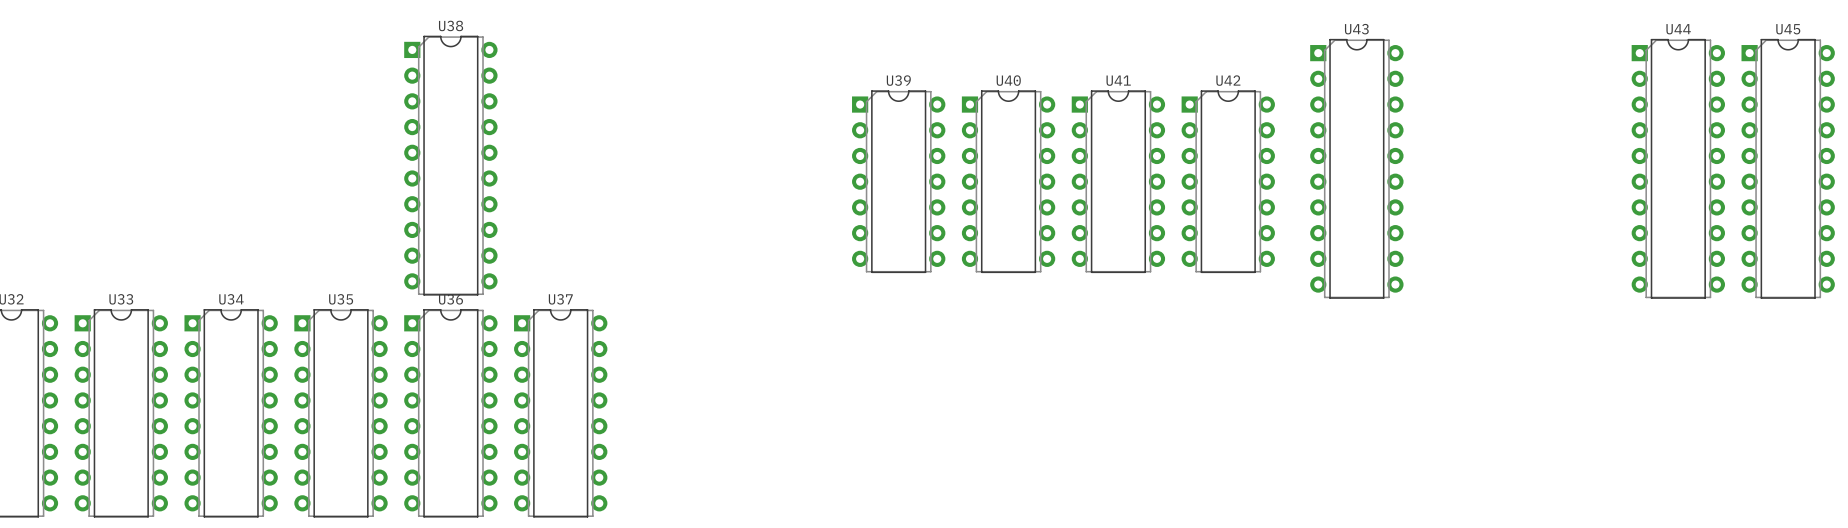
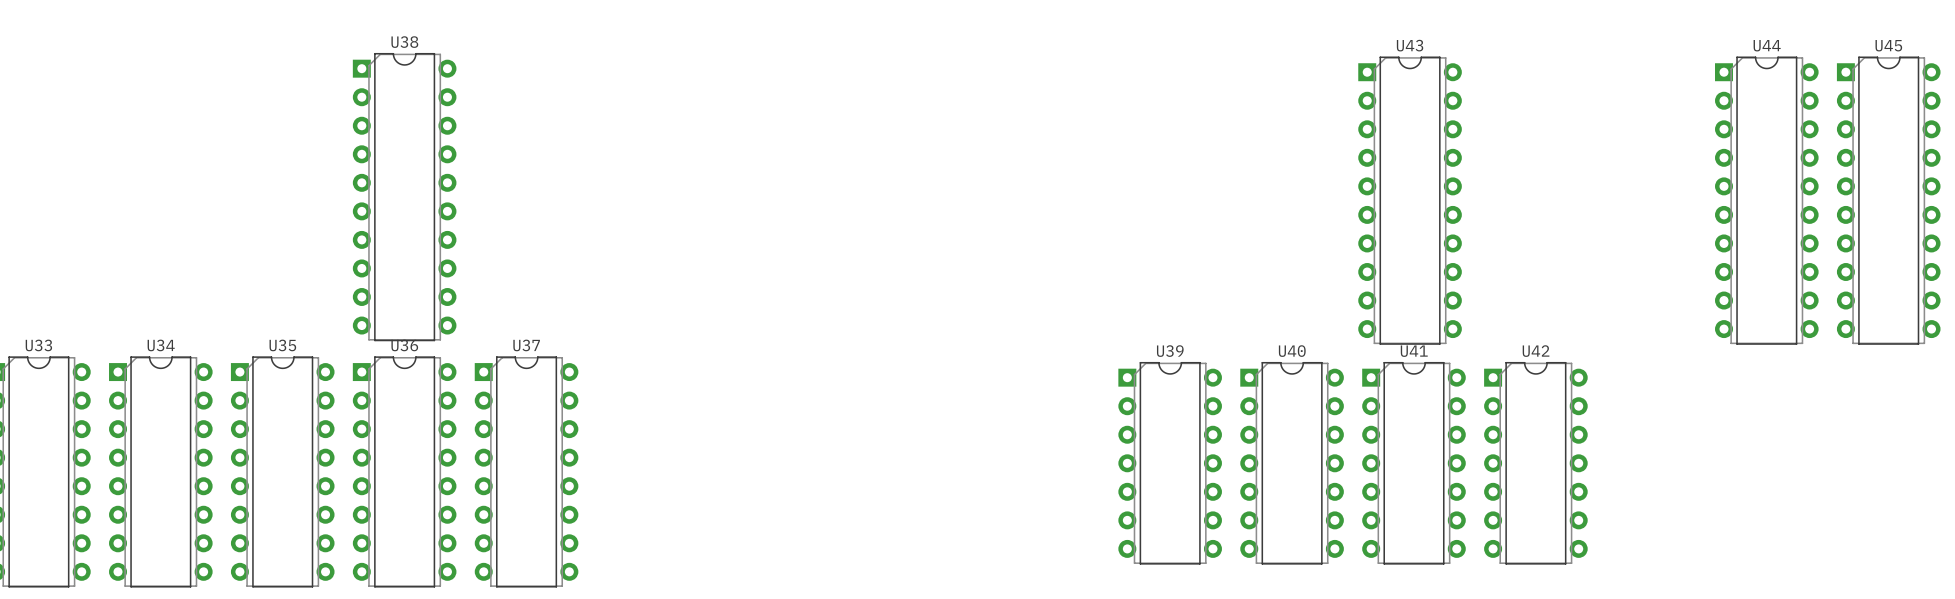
U39 position: (898, 181) -> (1170, 463)
U40 position: (1008, 181) -> (1292, 463)
U41 position: (1118, 181) -> (1413, 463)
U42 position: (1228, 181) -> (1535, 463)

